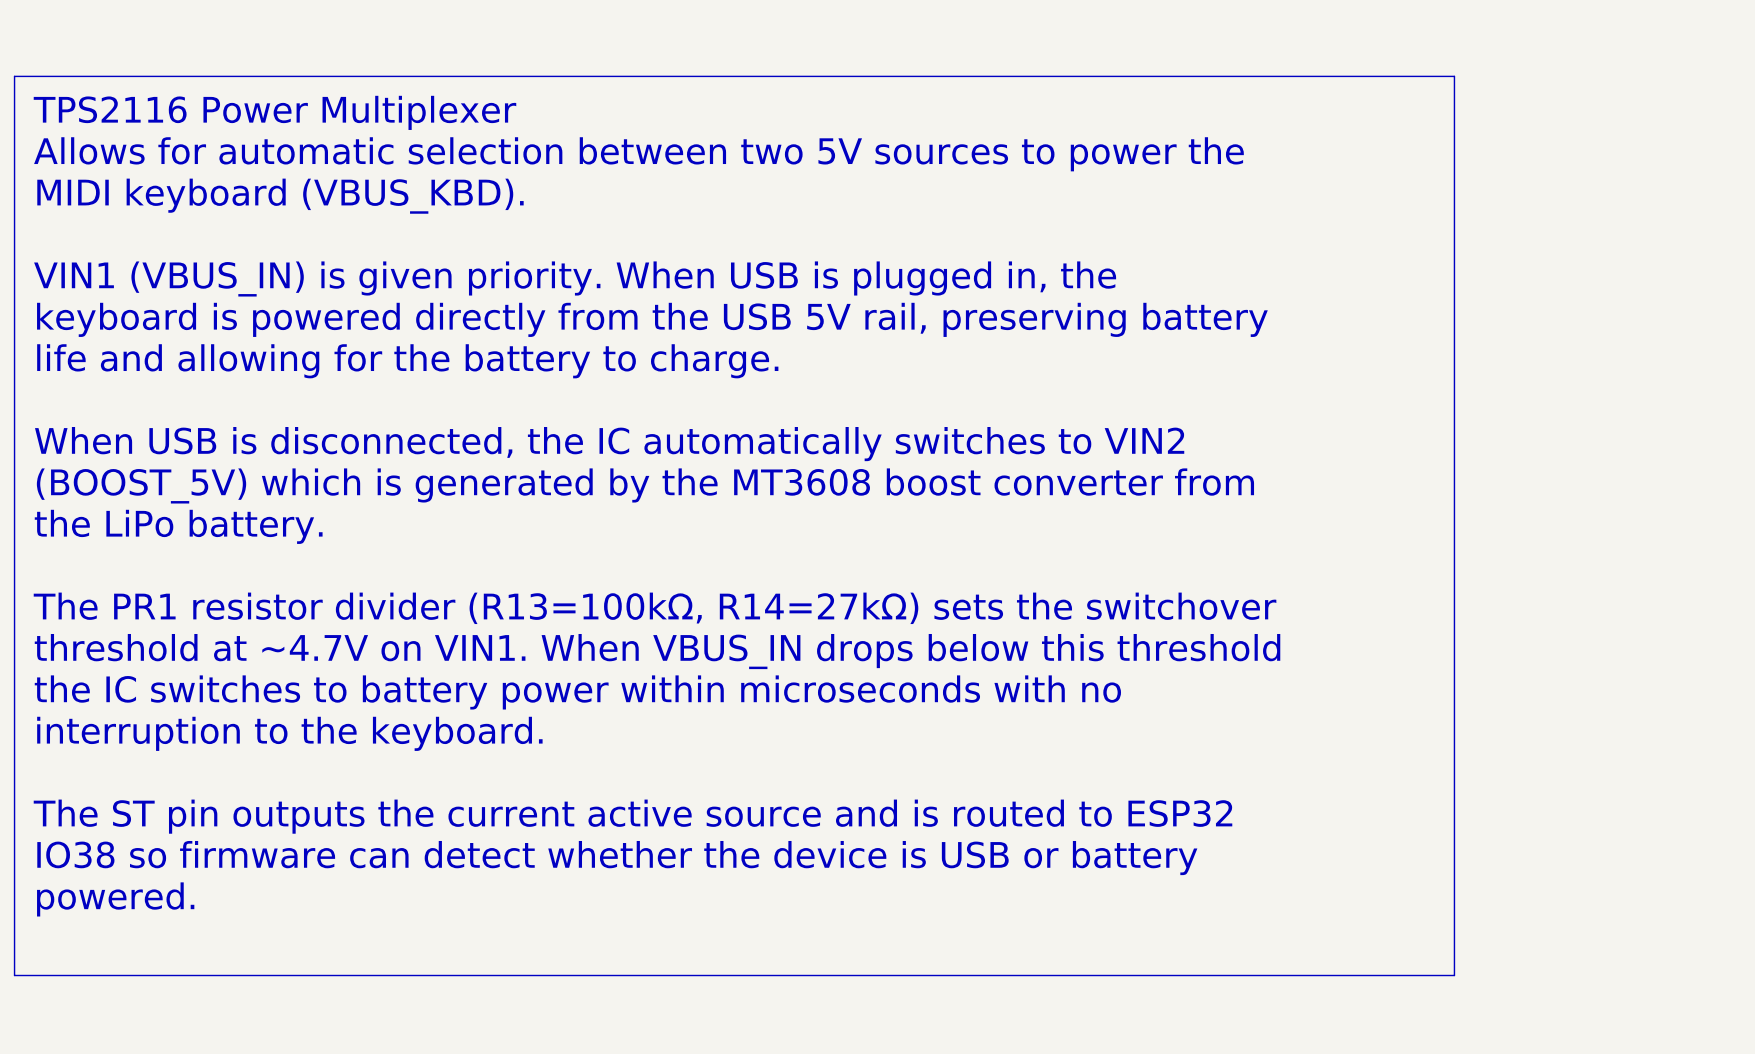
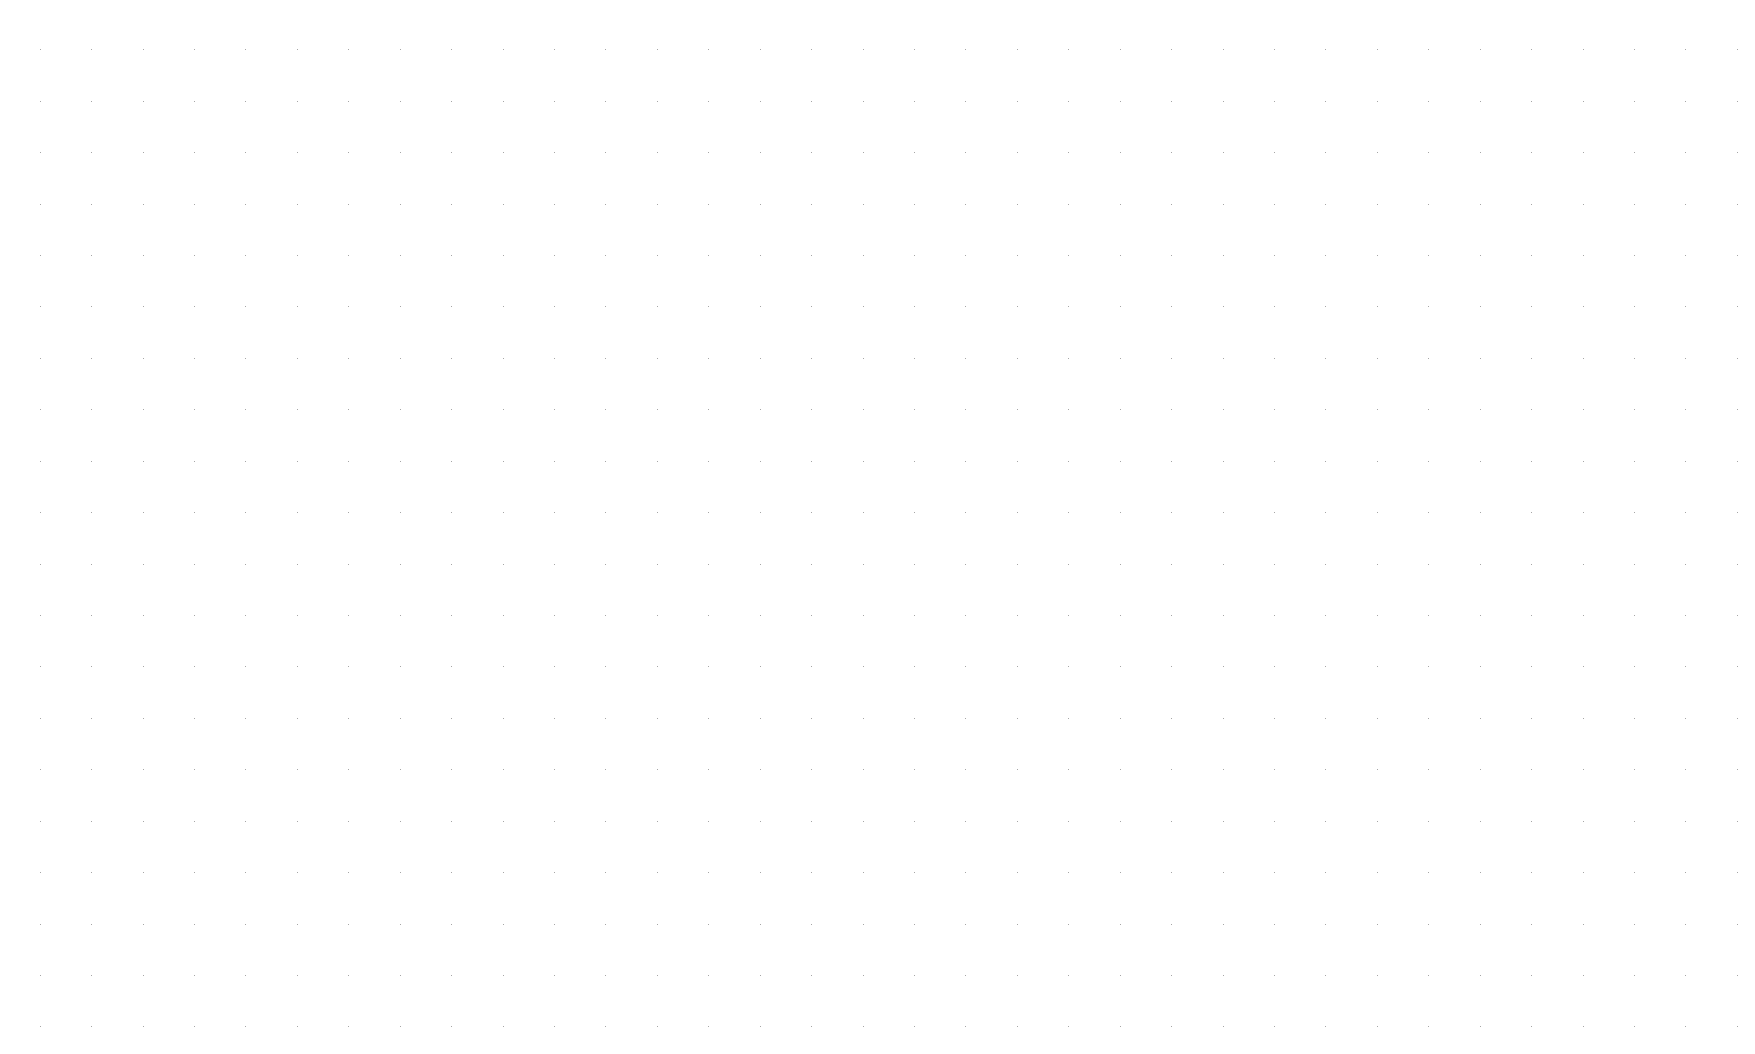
line: (14, 76) (1454, 76) (1454, 975) (14, 975) (14, 76) -> none
text: TPS2116 Power Multiplexer (274, 112) -> none
text: Allows for automatic selection between two 5V sources to power the (638, 154) -> none
text: MIDI keyboard (VBUS_KBD). (280, 196) -> none
text: VIN1 (VBUS_IN) is given priority. When USB is plugged in, the (575, 278) -> none
text: keyboard is powered directly from the USB 5V rail, preserving battery (652, 319) -> none
text: life and allowing for the battery to charge. (407, 361) -> none
text: When USB is disconnected, the IC automatically switches to VIN2 (609, 444) -> none
text: (BOOST_5V) which is generated by the MT3608 boost converter from (645, 485) -> none
text: the LiPo battery. (178, 526) -> none
text: The PR1 resistor divider (R13=100kΩ, R14=27kΩ) sets the switchover (655, 608) -> none
text: threshold at ~4.7V on VIN1. When VBUS_IN drops below this threshold (657, 651) -> none
text: the IC switches to battery power within microseconds with no (577, 692) -> none
text: interruption to the keyboard. (289, 733) -> none
text: The ST pin outputs the current active source and is routed to ESP32 (633, 816) -> none
text: IO38 so firmware can detect whether the device is USB or battery (617, 858) -> none
text: powered. (115, 899) -> none

